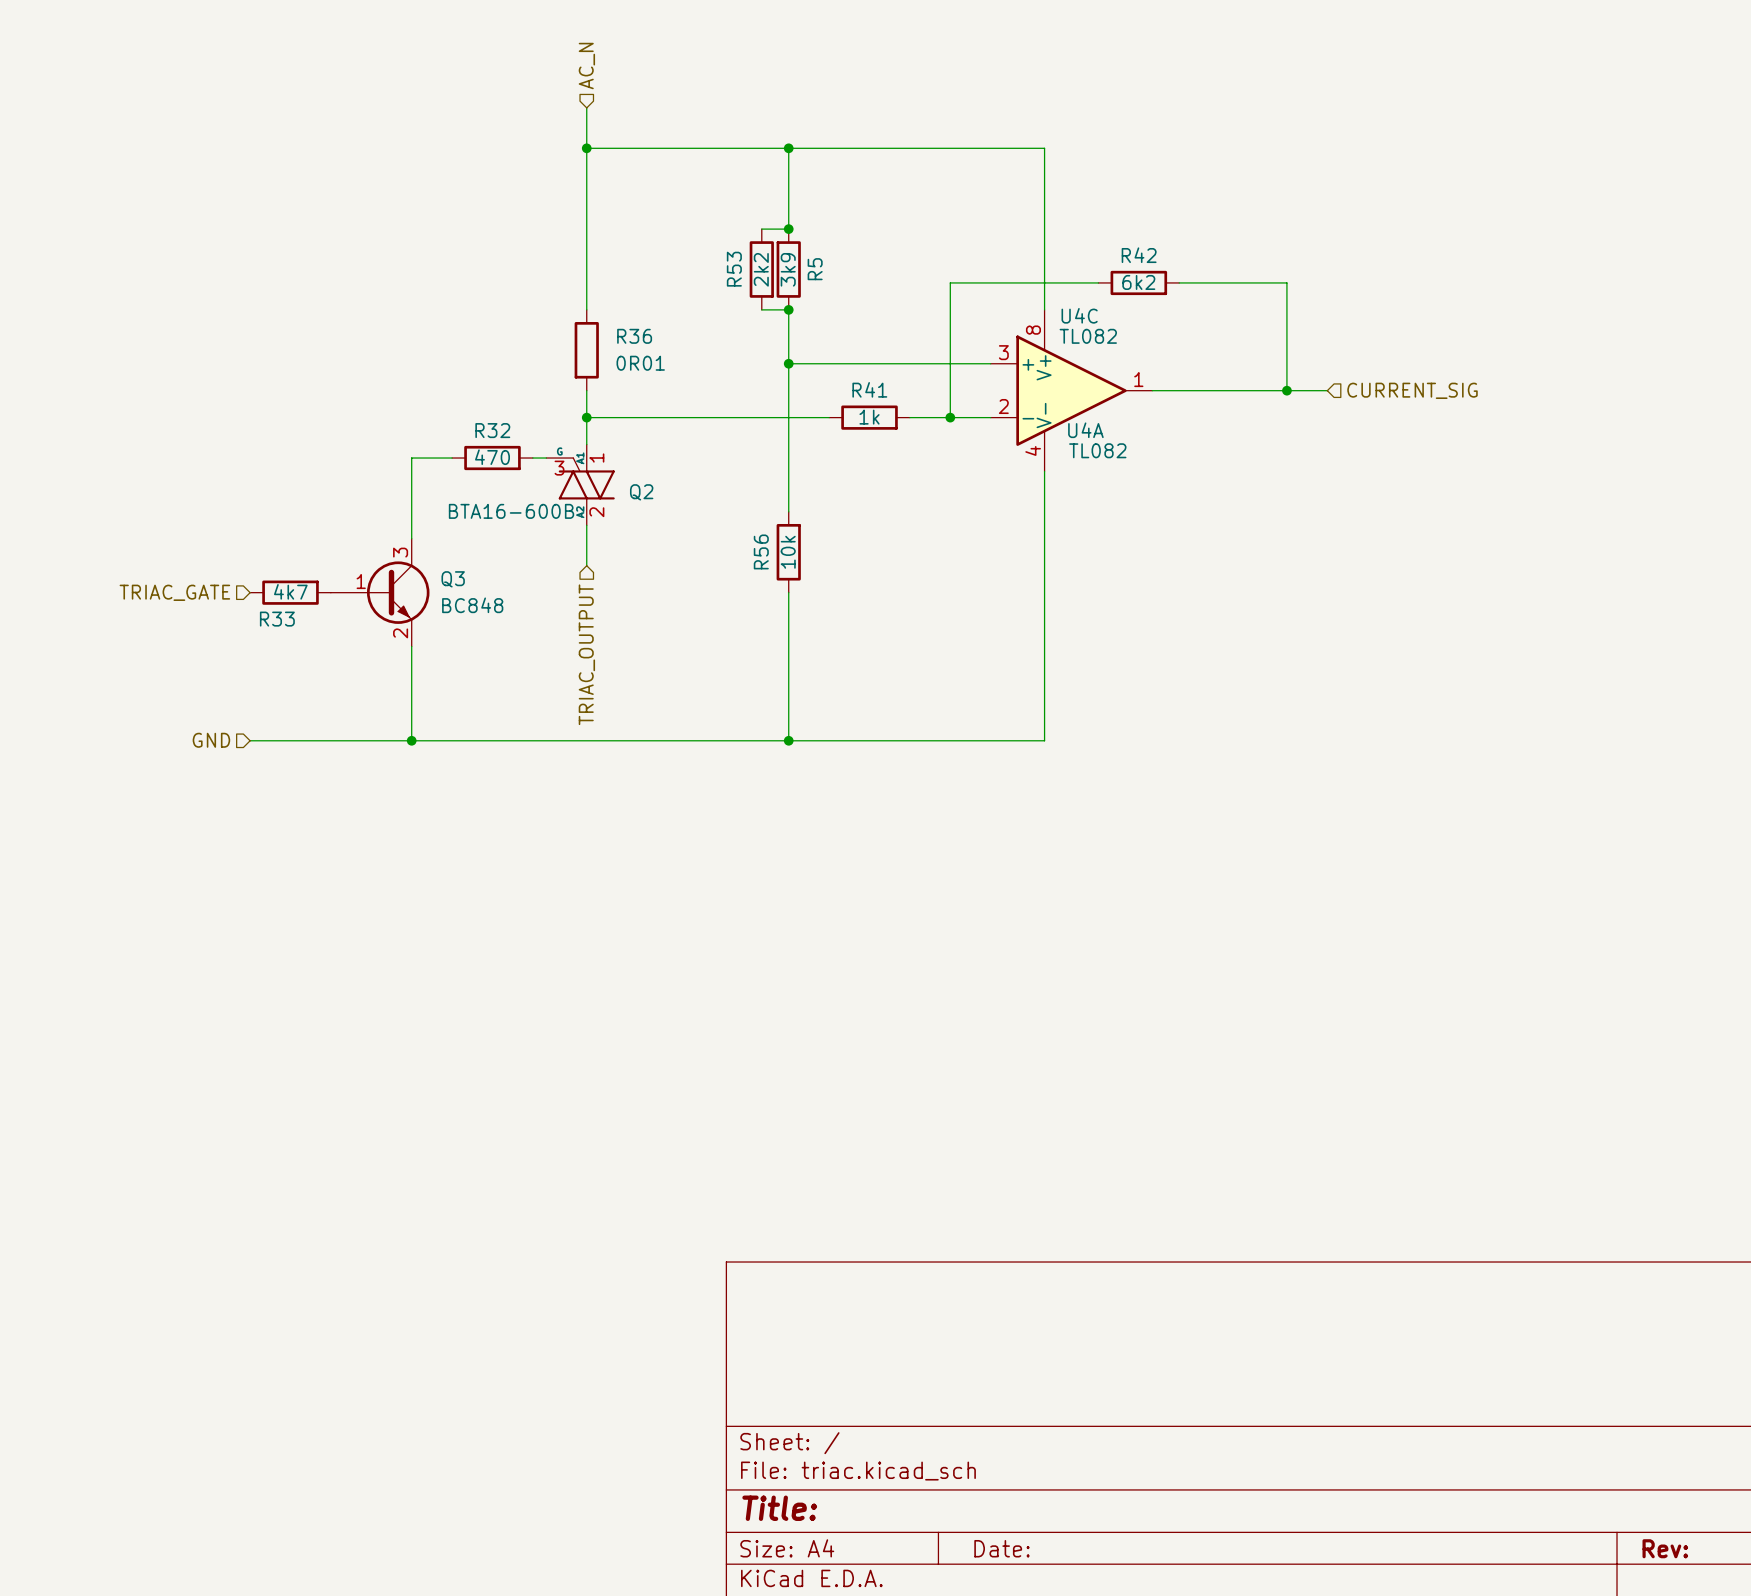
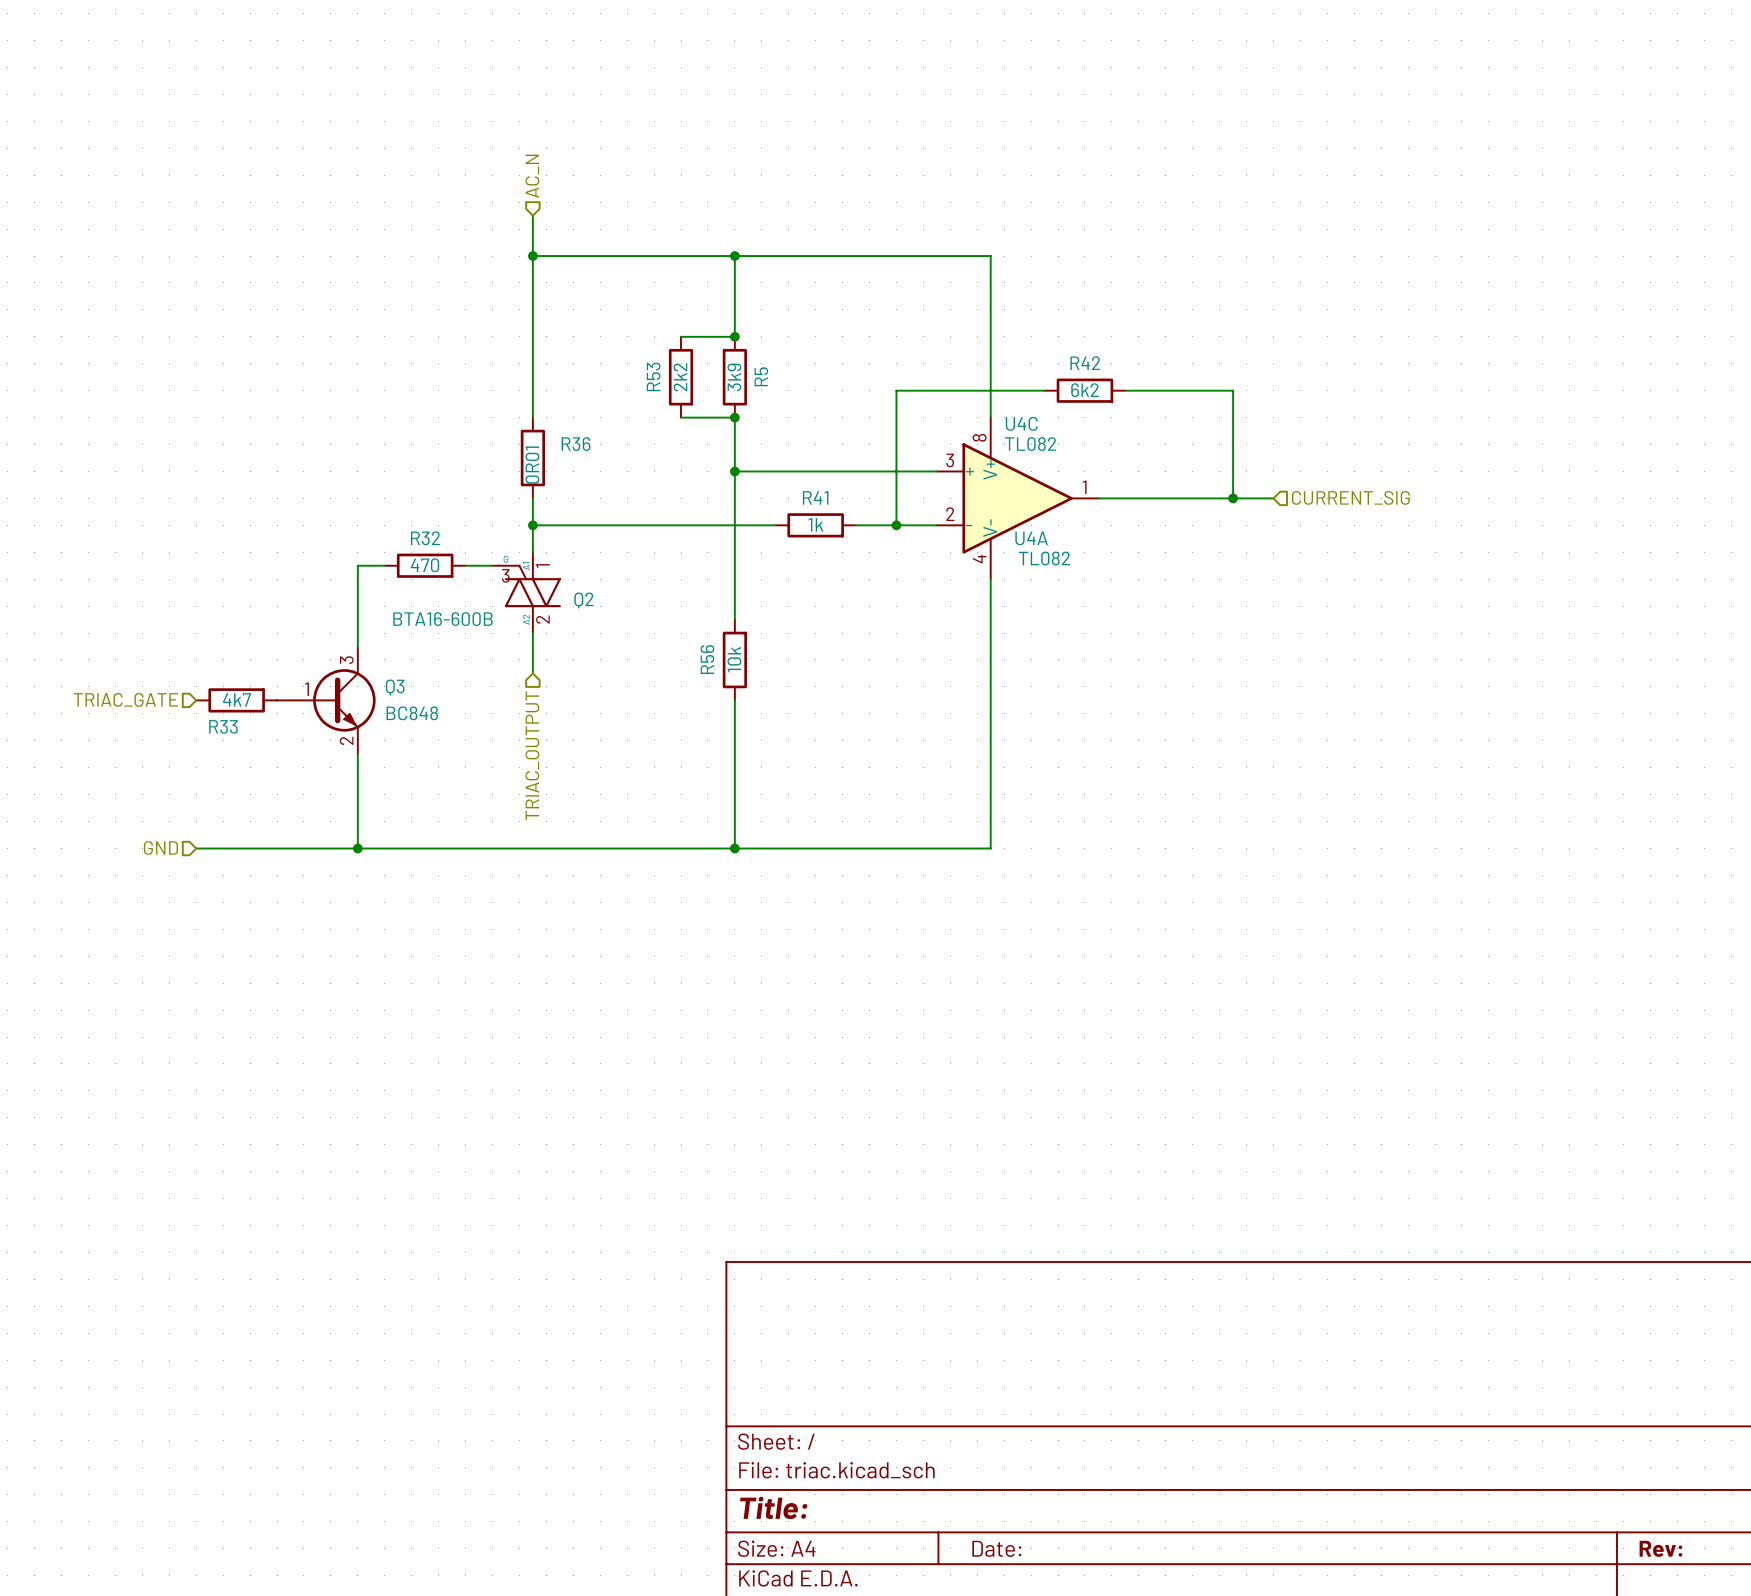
hierarchical label position: AC_N (586, 66) -> AC_N (532, 176)
wire: (586, 107) (586, 309) -> (532, 215) (532, 417)
wire: (586, 148) (1044, 148) (1044, 309) -> none
junction: (586, 148) -> none
wire: (788, 148) (788, 229) (761, 229) -> none
junction: (788, 148) -> none
junction: (788, 229) -> none
junction: none -> (532, 256)
wire: none -> (734, 256) (734, 336) (681, 336)
junction: none -> (734, 256)
R53 position: (761, 269) -> (681, 377)
R5 position: (788, 269) -> (734, 377)
wire: (1098, 282) (950, 282) (950, 417) -> (1044, 390) (896, 390) (896, 525)
R42 position: (1138, 282) -> (1084, 390)
wire: (1179, 282) (1286, 282) (1286, 390) -> none
wire: (761, 309) (788, 309) (788, 511) -> none
junction: (788, 309) -> none
junction: none -> (734, 336)
R36 position: (586, 350) -> (532, 458)
R36 value rotation: 0° (640, 363) -> 90° counterclockwise (532, 465)
wire: (788, 363) (990, 363) -> (734, 471) (936, 471)
junction: (788, 363) -> none
wire: (586, 390) (586, 444) -> (532, 498) (532, 552)
U4C position: (1044, 390) -> (990, 498)
U4A position: (1071, 390) -> (1017, 498)
wire: (1233, 390) (1327, 390) -> (1233, 390) (1233, 498)
junction: (1286, 390) -> none
hierarchical label position: CURRENT_SIG (1412, 390) -> CURRENT_SIG (1350, 497)
wire: (586, 417) (681, 417) -> none
junction: (586, 417) -> none
wire: (734, 417) (829, 417) -> (734, 417) (734, 619)
junction: none -> (734, 417)
R41 position: (869, 417) -> (815, 525)
wire: (909, 417) (990, 417) -> (532, 256) (990, 256) (990, 417)
junction: (950, 417) -> none
wire: (452, 458) (411, 458) (411, 538) -> none
R32 position: (492, 458) -> (425, 565)
wire: (532, 458) (546, 458) -> none
junction: none -> (734, 471)
wire: (1044, 471) (1044, 740) (250, 740) -> (990, 579) (990, 848) (196, 848)
Q2 position: (580, 484) -> (526, 592)
wire: none -> (1098, 498) (1273, 498)
junction: none -> (1233, 498)
wire: none -> (532, 525) (775, 525)
junction: none -> (532, 525)
wire: (586, 525) (586, 565) -> (532, 633) (532, 673)
wire: none -> (856, 525) (936, 525)
junction: none -> (896, 525)
R56 position: (788, 552) -> (734, 659)
wire: none -> (384, 565) (357, 565) (357, 646)
wire: none -> (465, 565) (492, 565)
hierarchical label position: TRIAC_GATE (174, 592) -> TRIAC_GATE (125, 699)
R33 position: (290, 592) -> (236, 700)
Q3 position: (380, 592) -> (326, 700)
wire: (788, 592) (788, 740) -> (734, 700) (734, 848)
wire: (411, 646) (411, 740) -> (357, 754) (357, 848)
hierarchical label position: TRIAC_OUTPUT (586, 654) -> TRIAC_OUTPUT (532, 755)
hierarchical label position: GND (211, 740) -> GND (160, 848)
junction: (411, 740) -> none
junction: (788, 740) -> none
junction: none -> (357, 848)
junction: none -> (734, 848)

